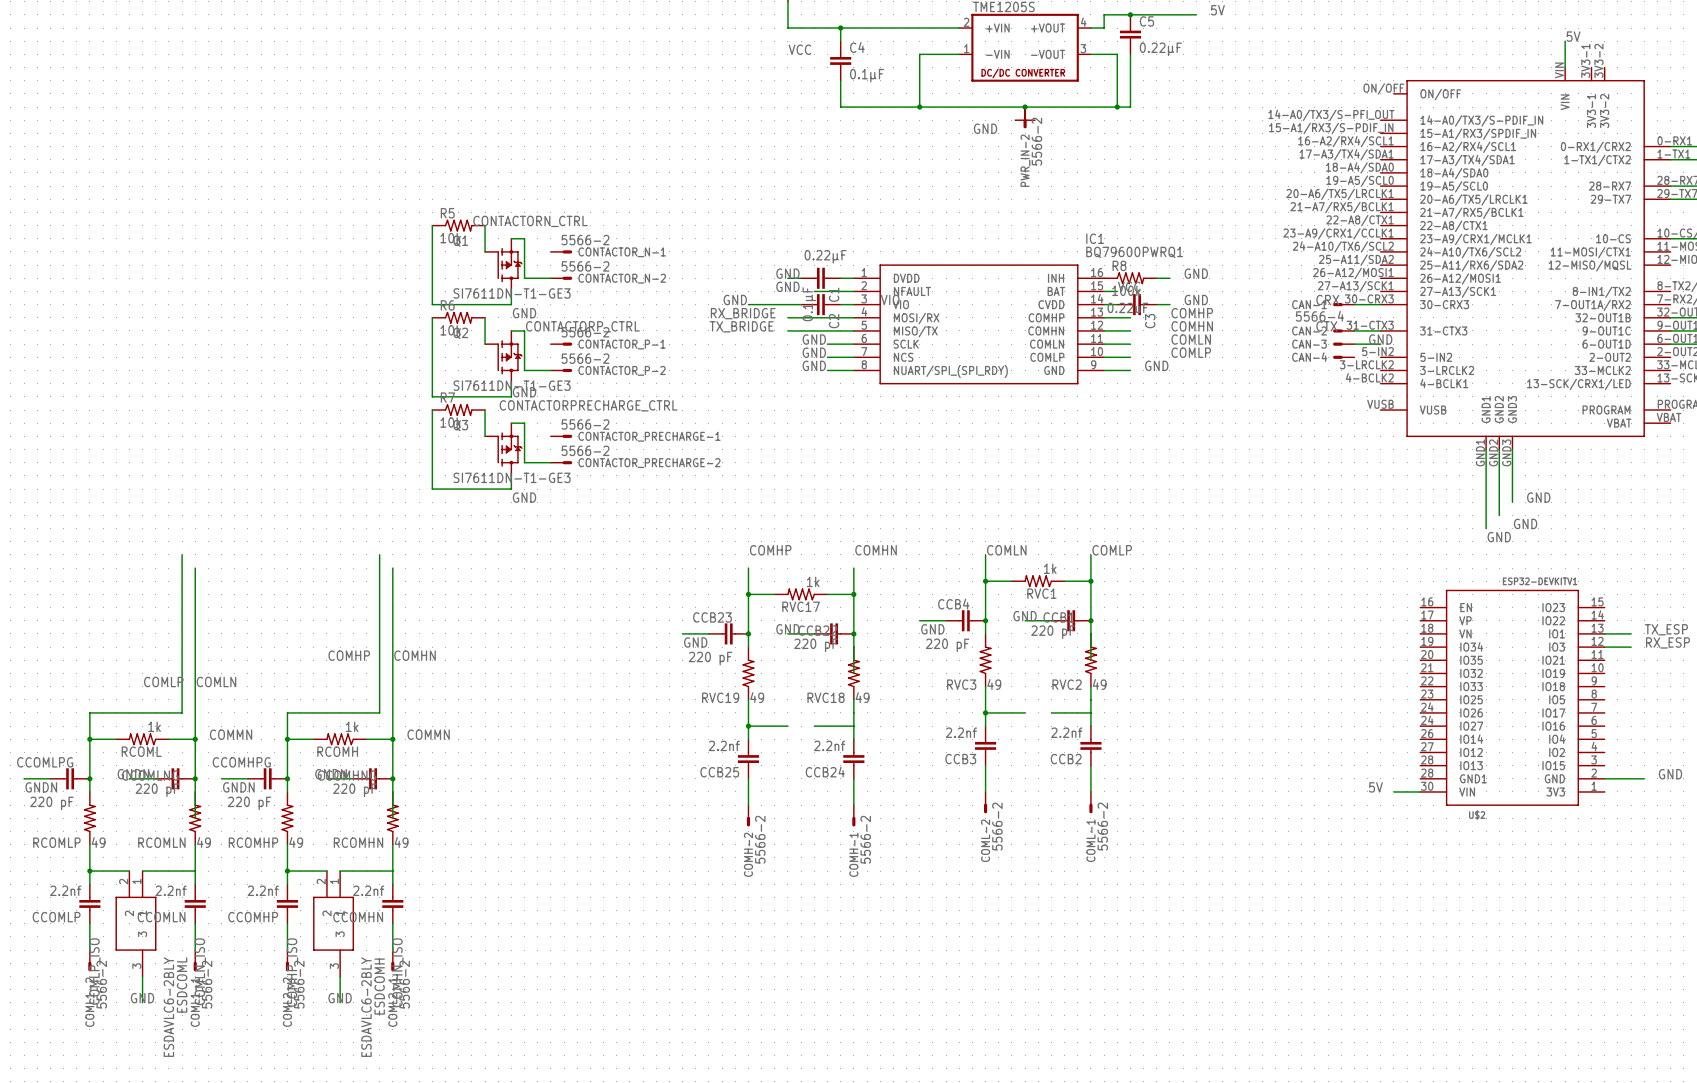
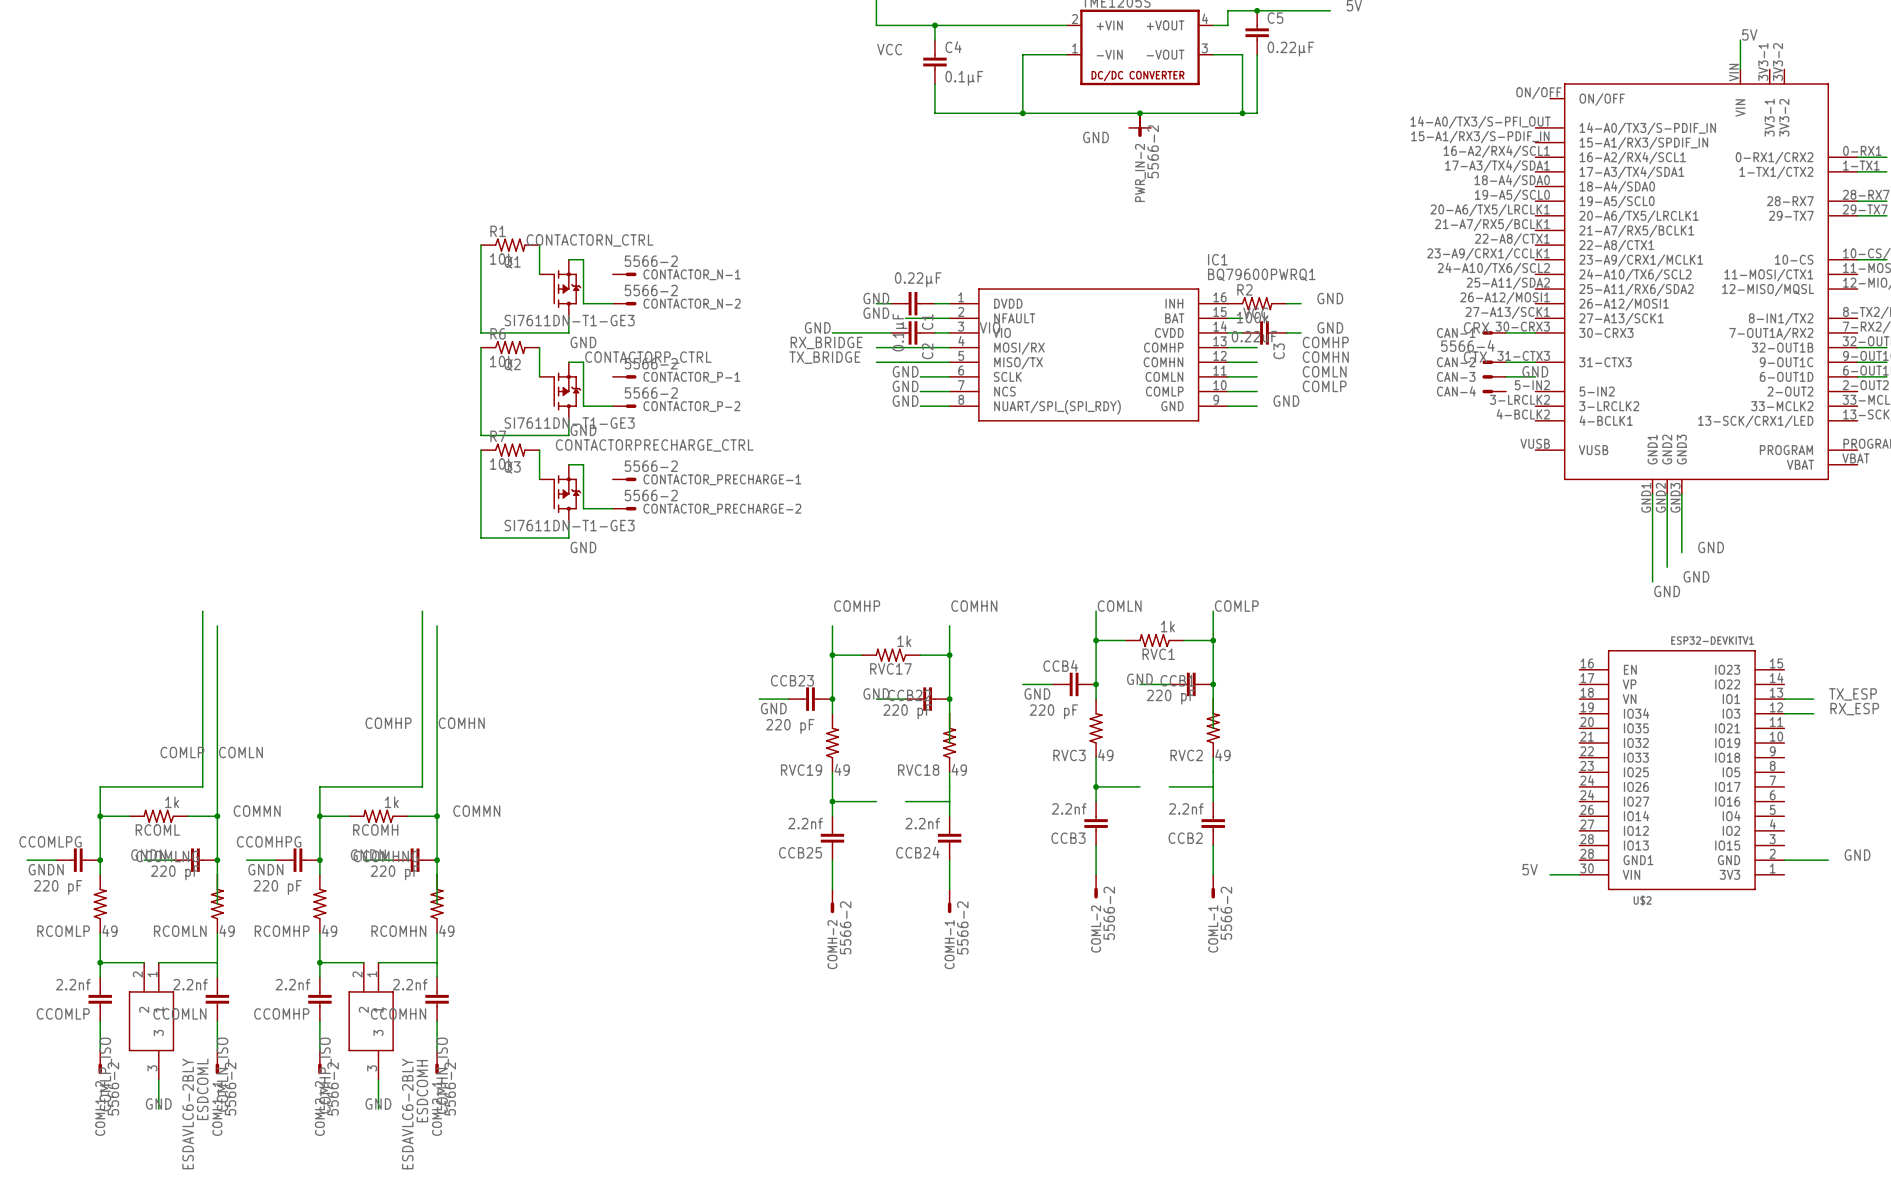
R5 name: R5 (447, 213) -> R1 (498, 231)
R8 name: R8 (1119, 265) -> R2 (1244, 289)

